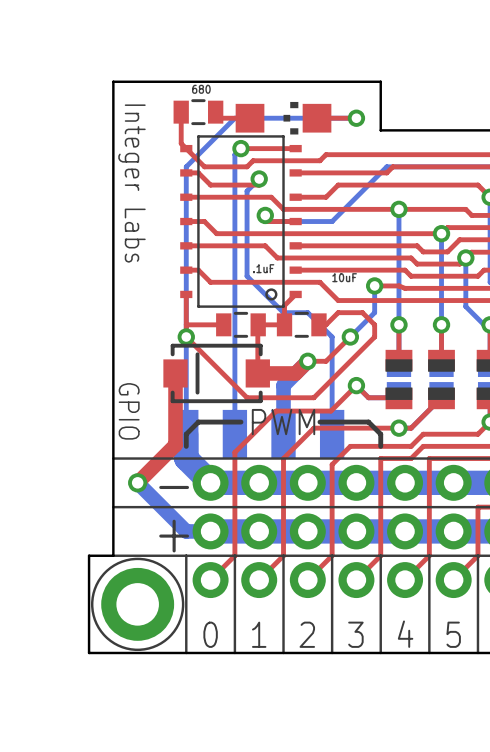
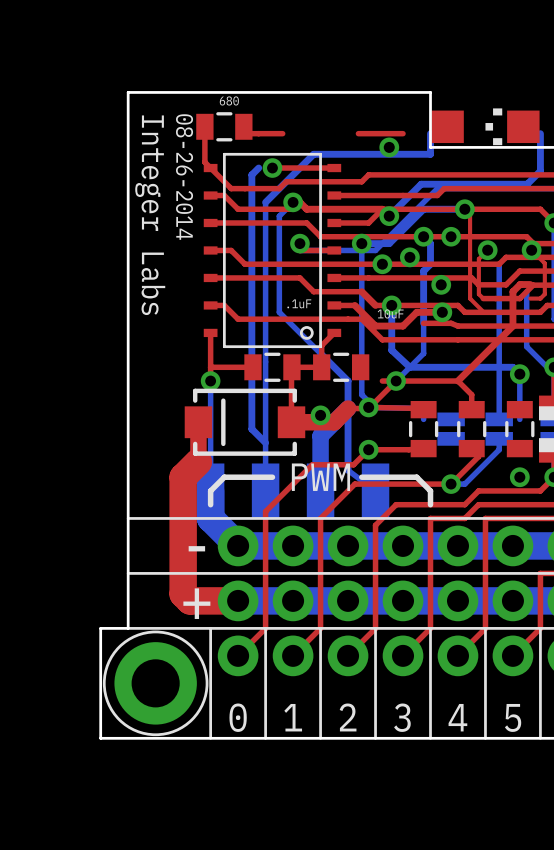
part position: (283, 118) -> (485, 126)
bottom track: (356, 118) (234, 118) (186, 166) (186, 330) -> none
via position: (356, 118) -> (389, 147)
bottom track: none -> (540, 133) (540, 171) (527, 184) (421, 184) (389, 216)
bottom track: none -> (258, 168) (251, 174) (251, 429) (265, 442)
bottom track: (240, 148) (234, 154) (234, 178) -> (430, 133) (430, 154) (313, 154) (265, 202)
text: none -> 08-26-2014 (184, 177)
top track: none -> (293, 202) (299, 202) (306, 209) (382, 209) (389, 216)
top track: none -> (464, 209) (470, 214) (470, 298) (484, 312) (495, 312)
bottom track: none -> (464, 209) (423, 209) (389, 243) (361, 243) (361, 394) (368, 401) (368, 407) (423, 408) (423, 419)
via: none -> (464, 209)
via: none -> (389, 216)
bottom track: none -> (423, 236) (430, 243) (430, 264) (423, 271) (423, 323)
via: none -> (423, 236)
bottom track: (398, 209) (398, 370) -> none
via: none -> (361, 243)
top track: none -> (531, 250) (544, 263) (544, 294) (540, 298) (530, 298)
via: none -> (531, 250)
via: none -> (409, 257)
via: none -> (382, 264)
via position: (441, 233) -> (487, 250)
via: none -> (441, 284)
top track: none -> (530, 284) (520, 284) (512, 291) (512, 326) (457, 381)
top track: (319, 257) (411, 257) (417, 264) (427, 264) -> (487, 250) (478, 259) (478, 294) (483, 298)
via: (465, 257) -> none
top track: (313, 270) (332, 270) -> (361, 291) (375, 305)
top track: none -> (354, 305) (375, 326) (403, 326) (416, 312) (442, 312)
bottom track: none -> (391, 305) (391, 350) (409, 367) (512, 367) (519, 374) (519, 419)
via: none -> (391, 305)
via: none -> (442, 312)
via: (374, 285) -> none
bottom track: (283, 312) (307, 312) (332, 336) (332, 434) -> (320, 353) (348, 381) (348, 470) (375, 490)
top track: (318, 324) (326, 324) (338, 312) (362, 312) (374, 324) (374, 336) (313, 397) (247, 397) (186, 336) (186, 330) -> none
top track: (398, 324) (398, 360) -> none
via: (398, 324) -> none
top track: (441, 324) (441, 360) -> none
via: (441, 324) -> none
via: none -> (519, 374)
top track: none -> (382, 381) (457, 381)
top track: none -> (457, 381) (471, 394) (471, 409)
top track: none -> (368, 407) (423, 409)
via: none -> (368, 407)
via: (307, 361) -> none
via: none -> (320, 415)
part: none -> (423, 429)
part: (398, 379) -> none
part: none -> (471, 429)
part: (441, 379) -> none
part: none -> (519, 429)
via: (356, 385) -> none
via: none -> (368, 449)
top track: (398, 398) (368, 397) (356, 385) (330, 411) (312, 411) -> (423, 448) (368, 449) (353, 464)
top track: (441, 398) (411, 428) (398, 428) -> (471, 448) (478, 456) (451, 484)
top track: (175, 408) (175, 444) (137, 482) -> (198, 461) (183, 477) (183, 594) (190, 600) (238, 600)
text: GPIO (129, 411) -> none
via: none -> (519, 477)
bottom track: (137, 482) (186, 531) (210, 531) -> none
via: (137, 482) -> none

